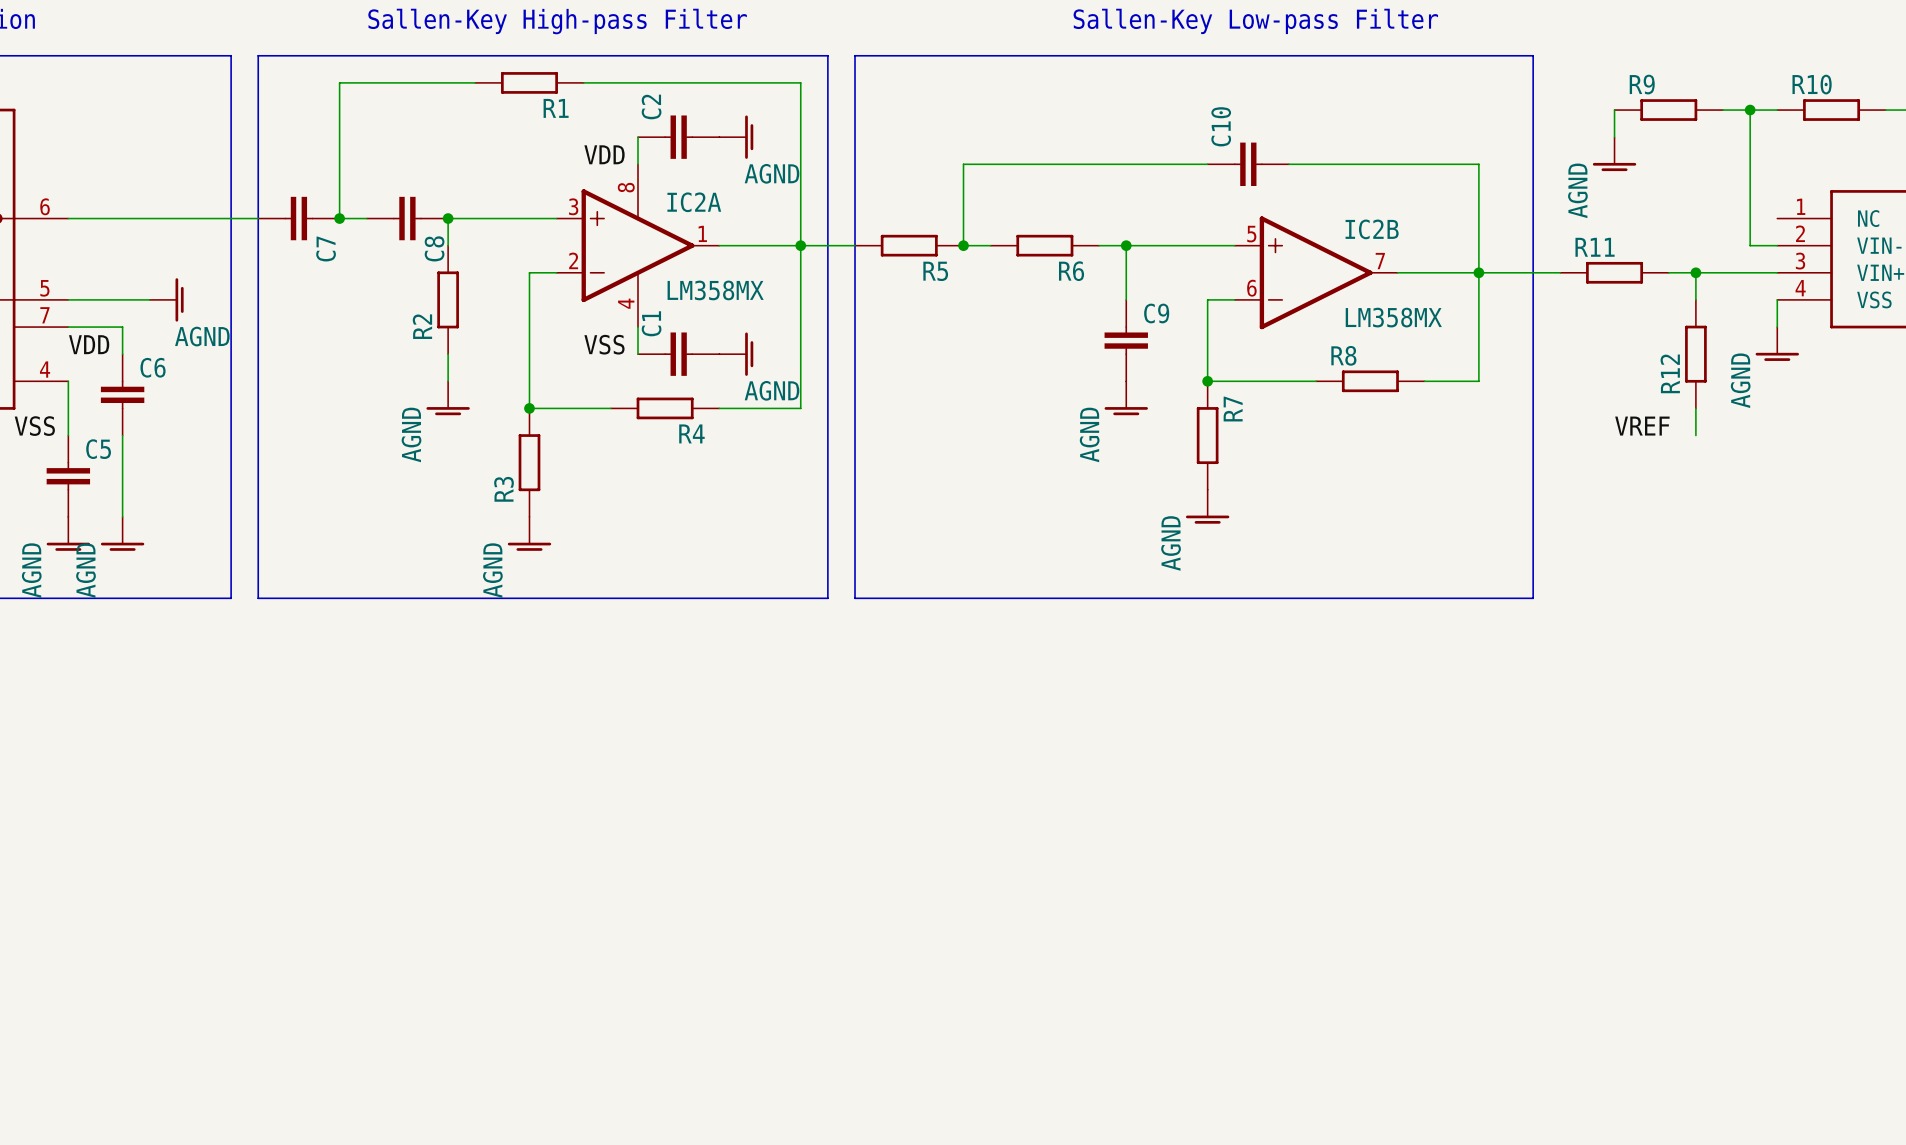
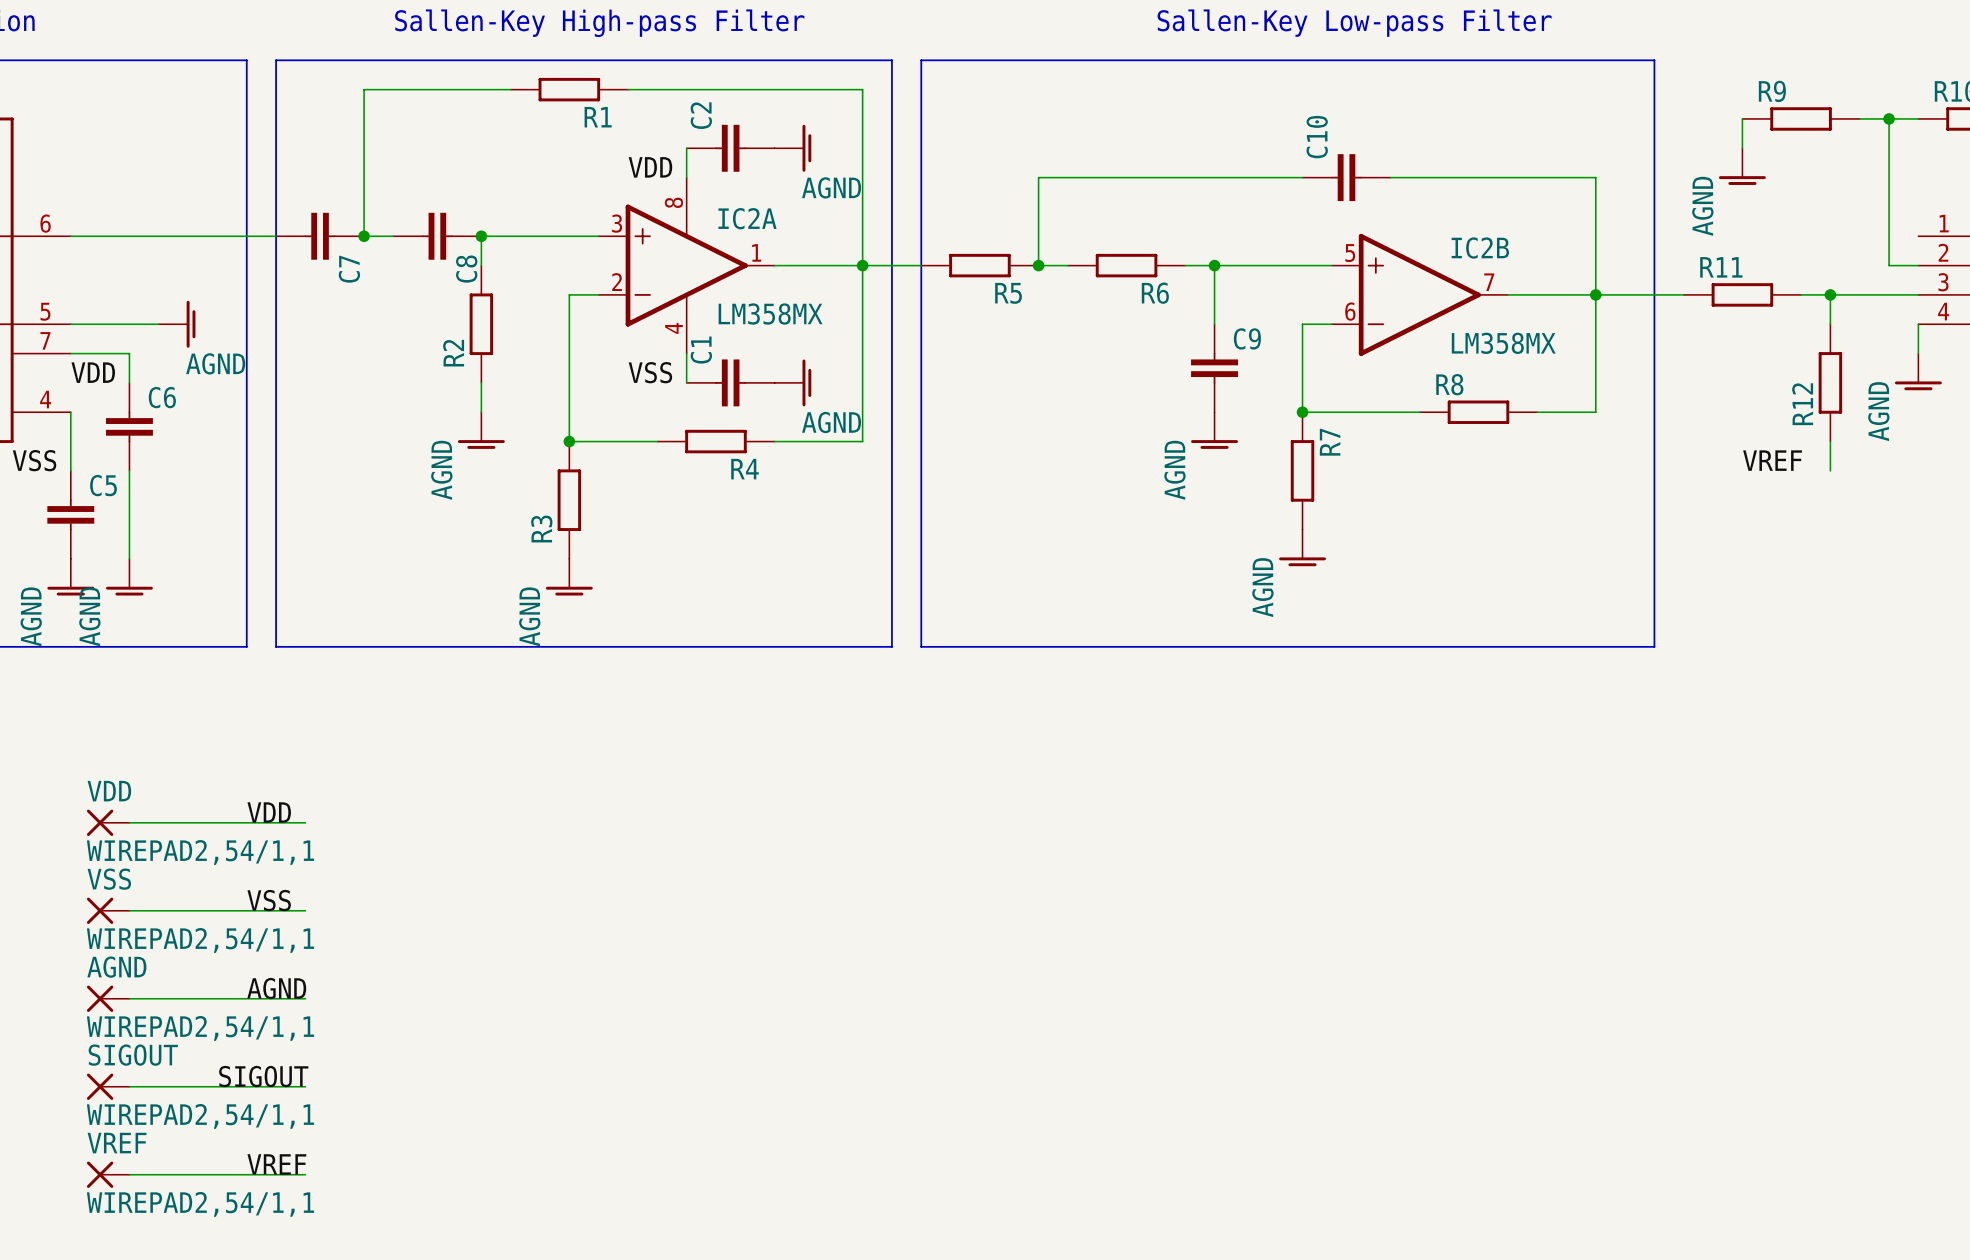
label: none -> VDD (269, 812)
VDD: none -> WIREPAD2,54/1,1 (108, 822)
wire: none -> (129, 822) (305, 822)
label: none -> VSS (269, 900)
VSS: none -> WIREPAD2,54/1,1 (108, 910)
wire: none -> (129, 910) (305, 910)
label: none -> AGND (276, 988)
AGND: none -> WIREPAD2,54/1,1 (108, 998)
wire: none -> (129, 998) (305, 998)
label: none -> SIGOUT (263, 1076)
SIGOUT: none -> WIREPAD2,54/1,1 (108, 1086)
wire: none -> (129, 1086) (305, 1086)
label: none -> VREF (276, 1164)
VREF: none -> WIREPAD2,54/1,1 (108, 1174)
wire: none -> (129, 1174) (305, 1174)

